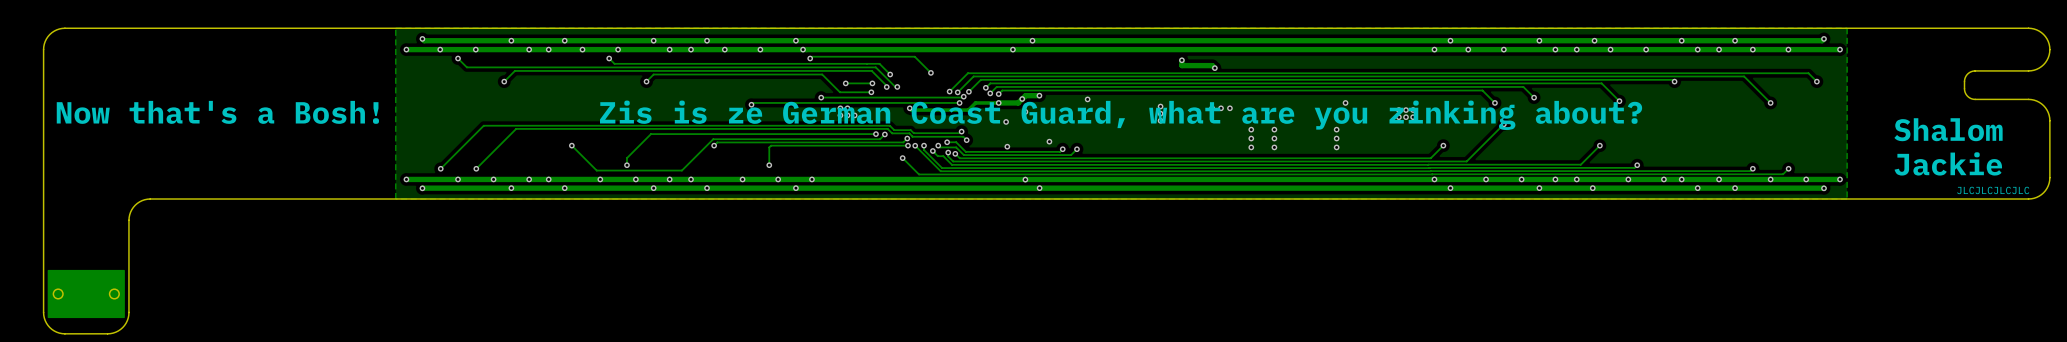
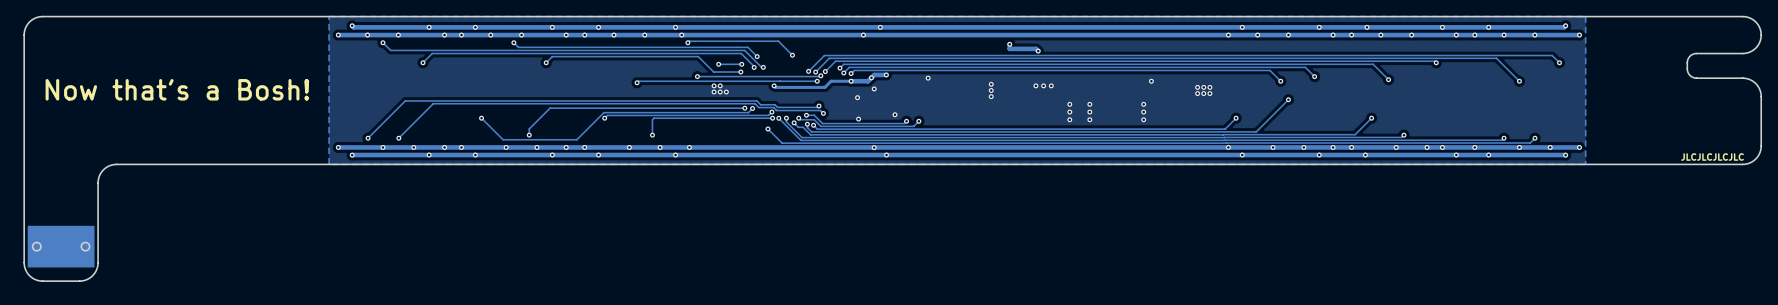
text: Zis is ze German Coast Guard, what are you zinking about? (1121, 115) -> none
text: Shalom (1948, 129) -> none
text: Jackie (1948, 163) -> none

